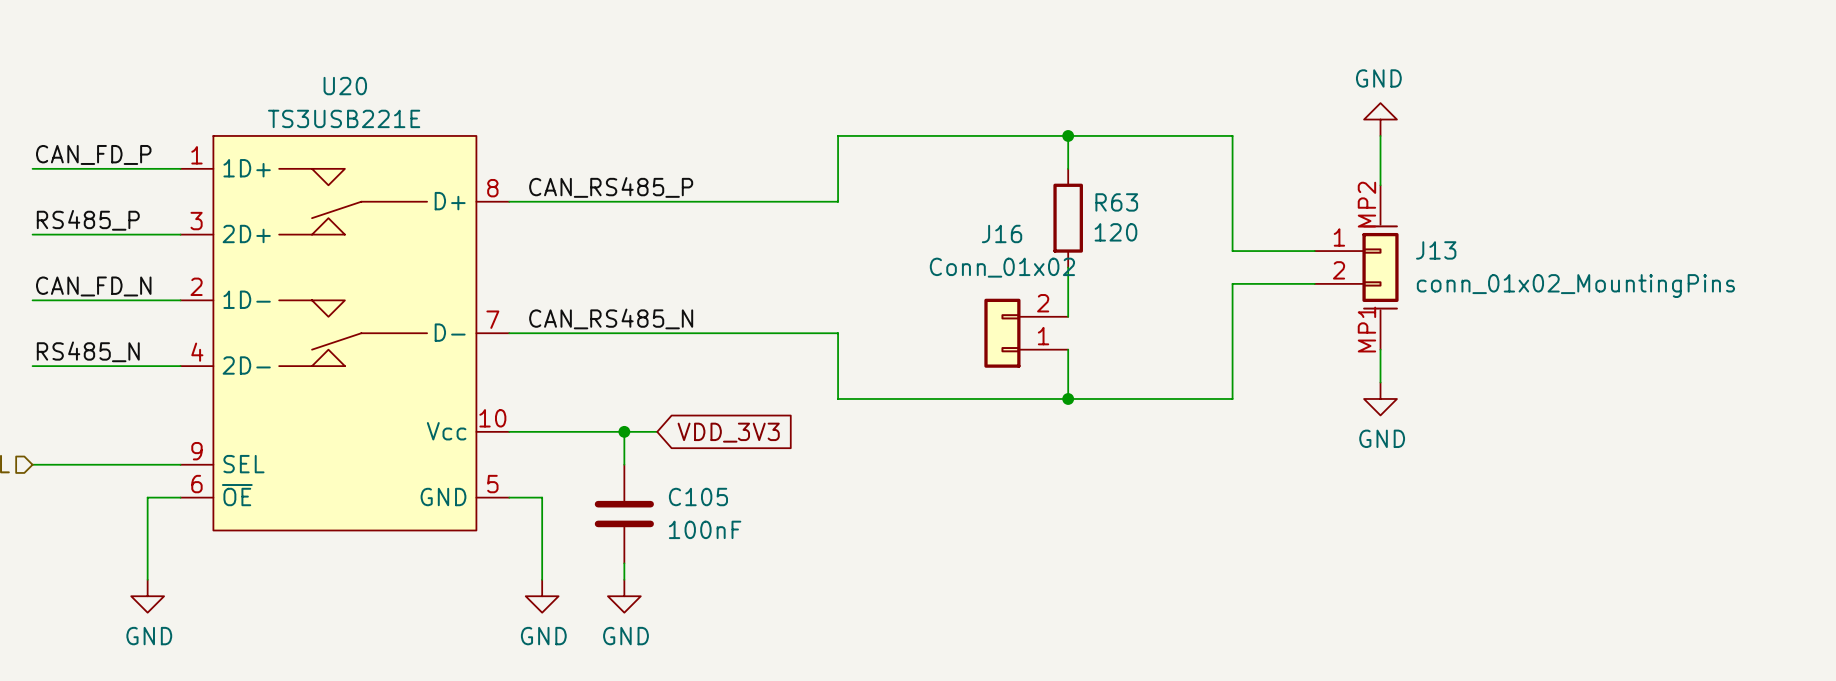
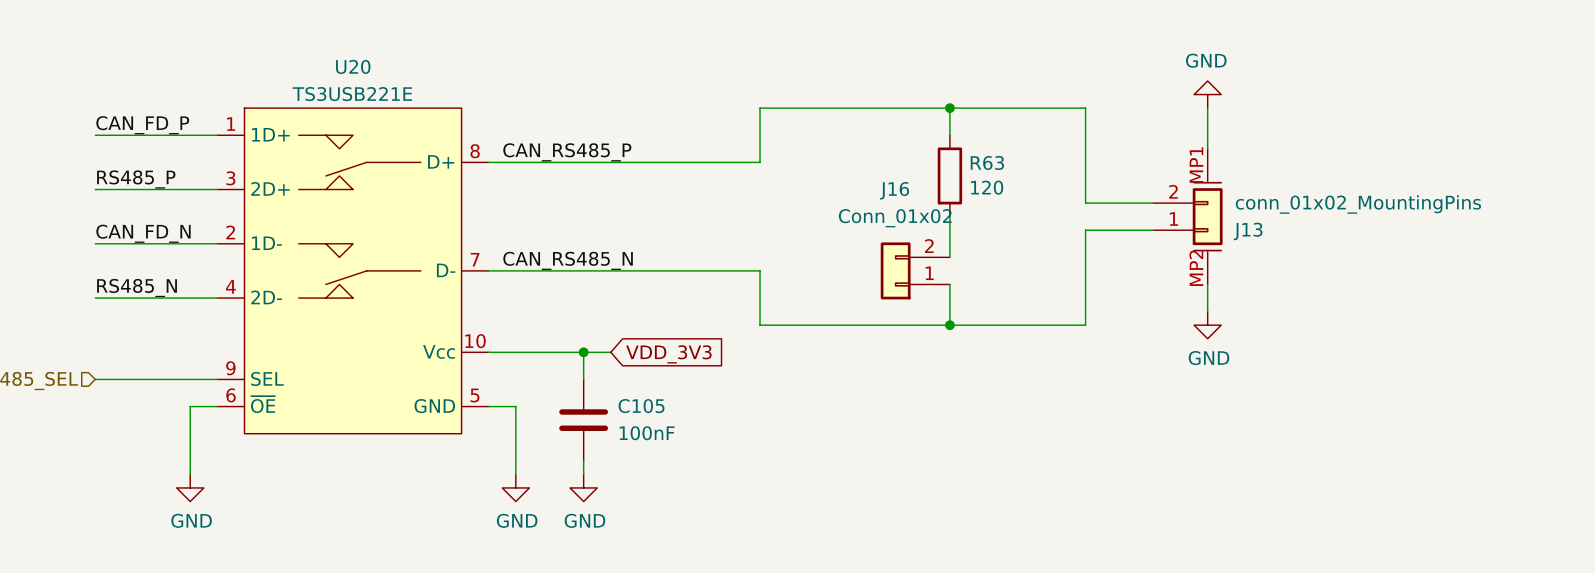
J13 flip: as is (1380, 267) -> up-down (1207, 216)

